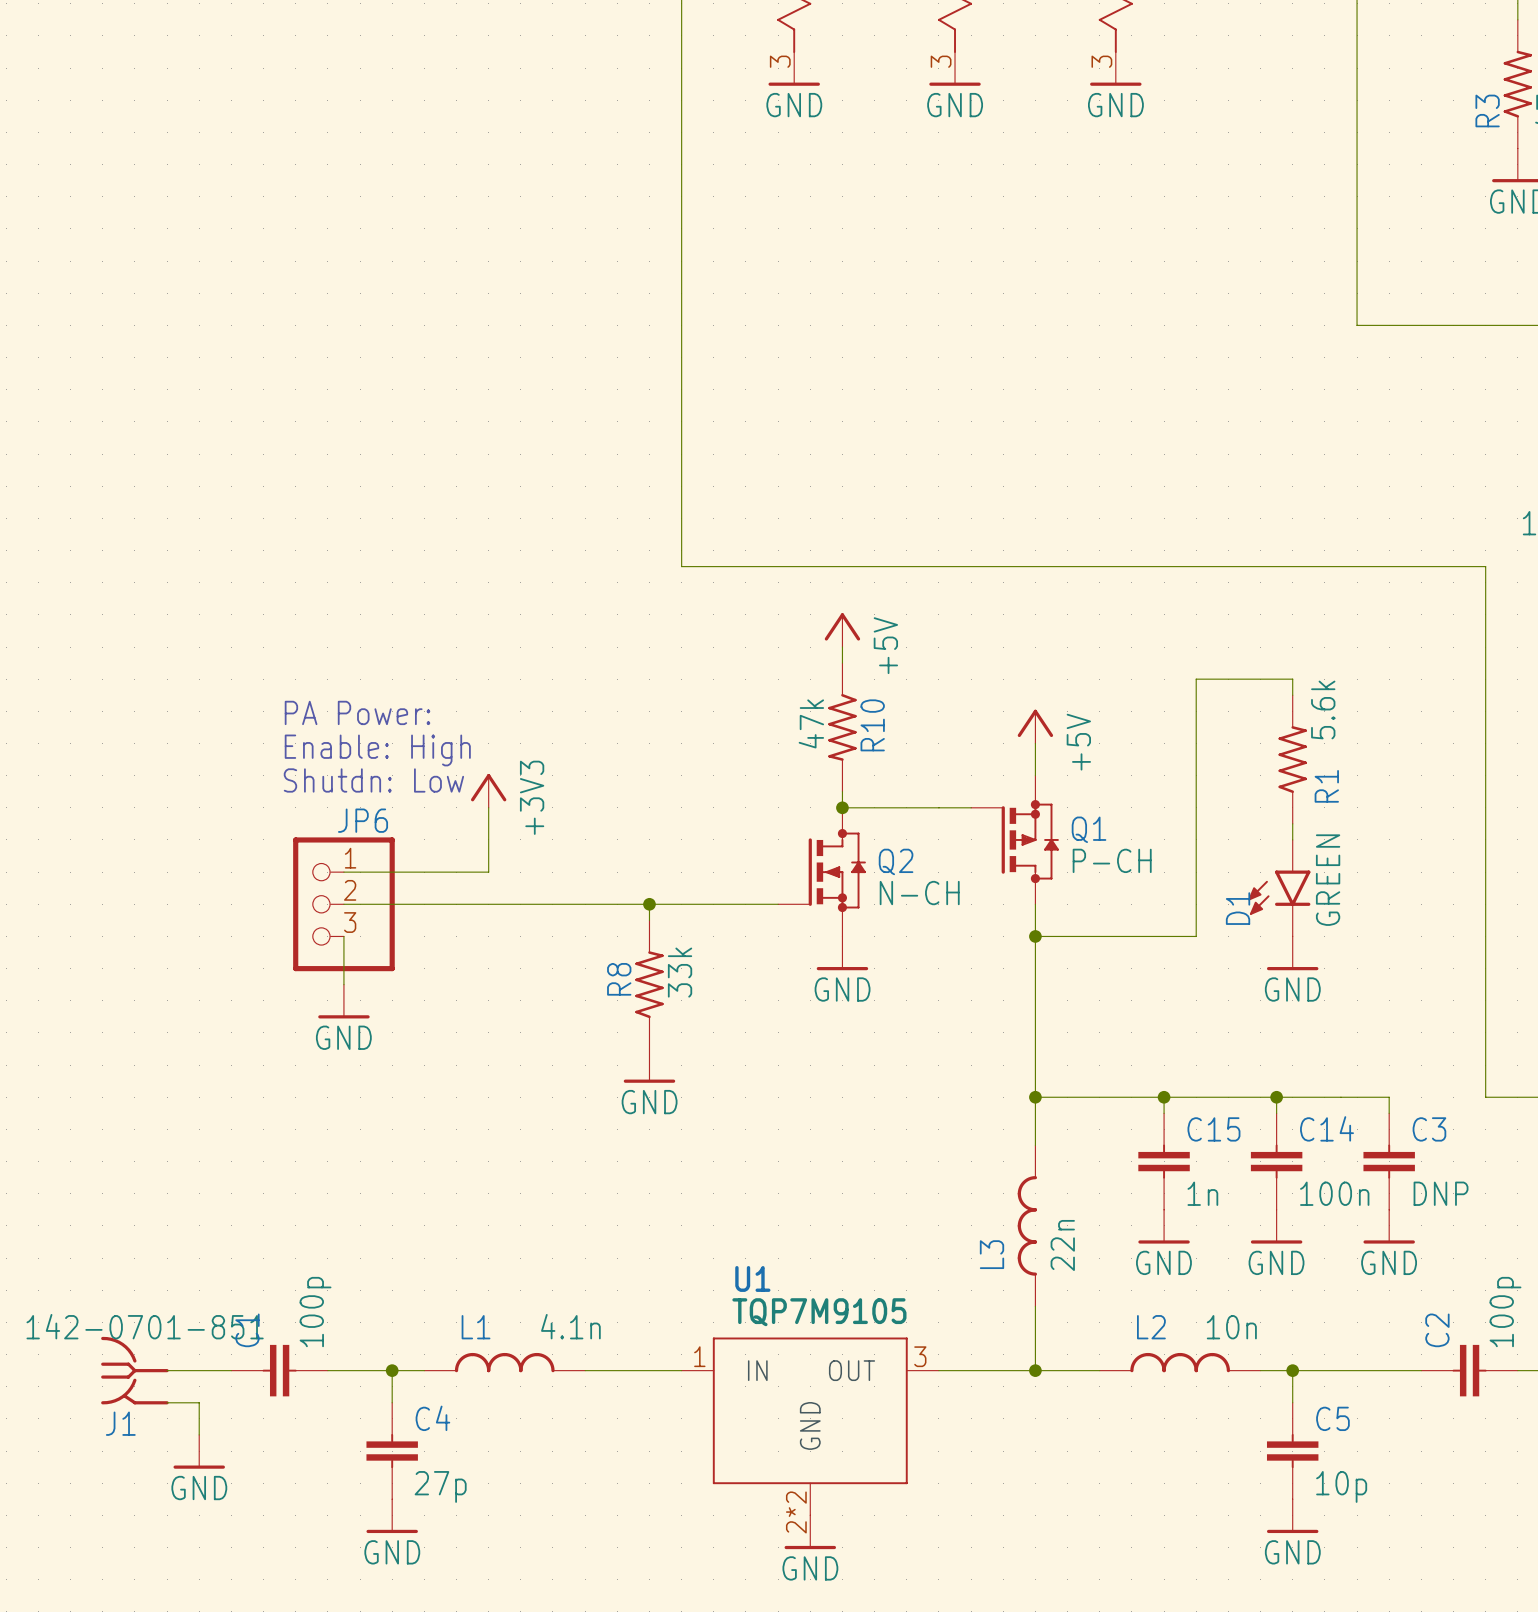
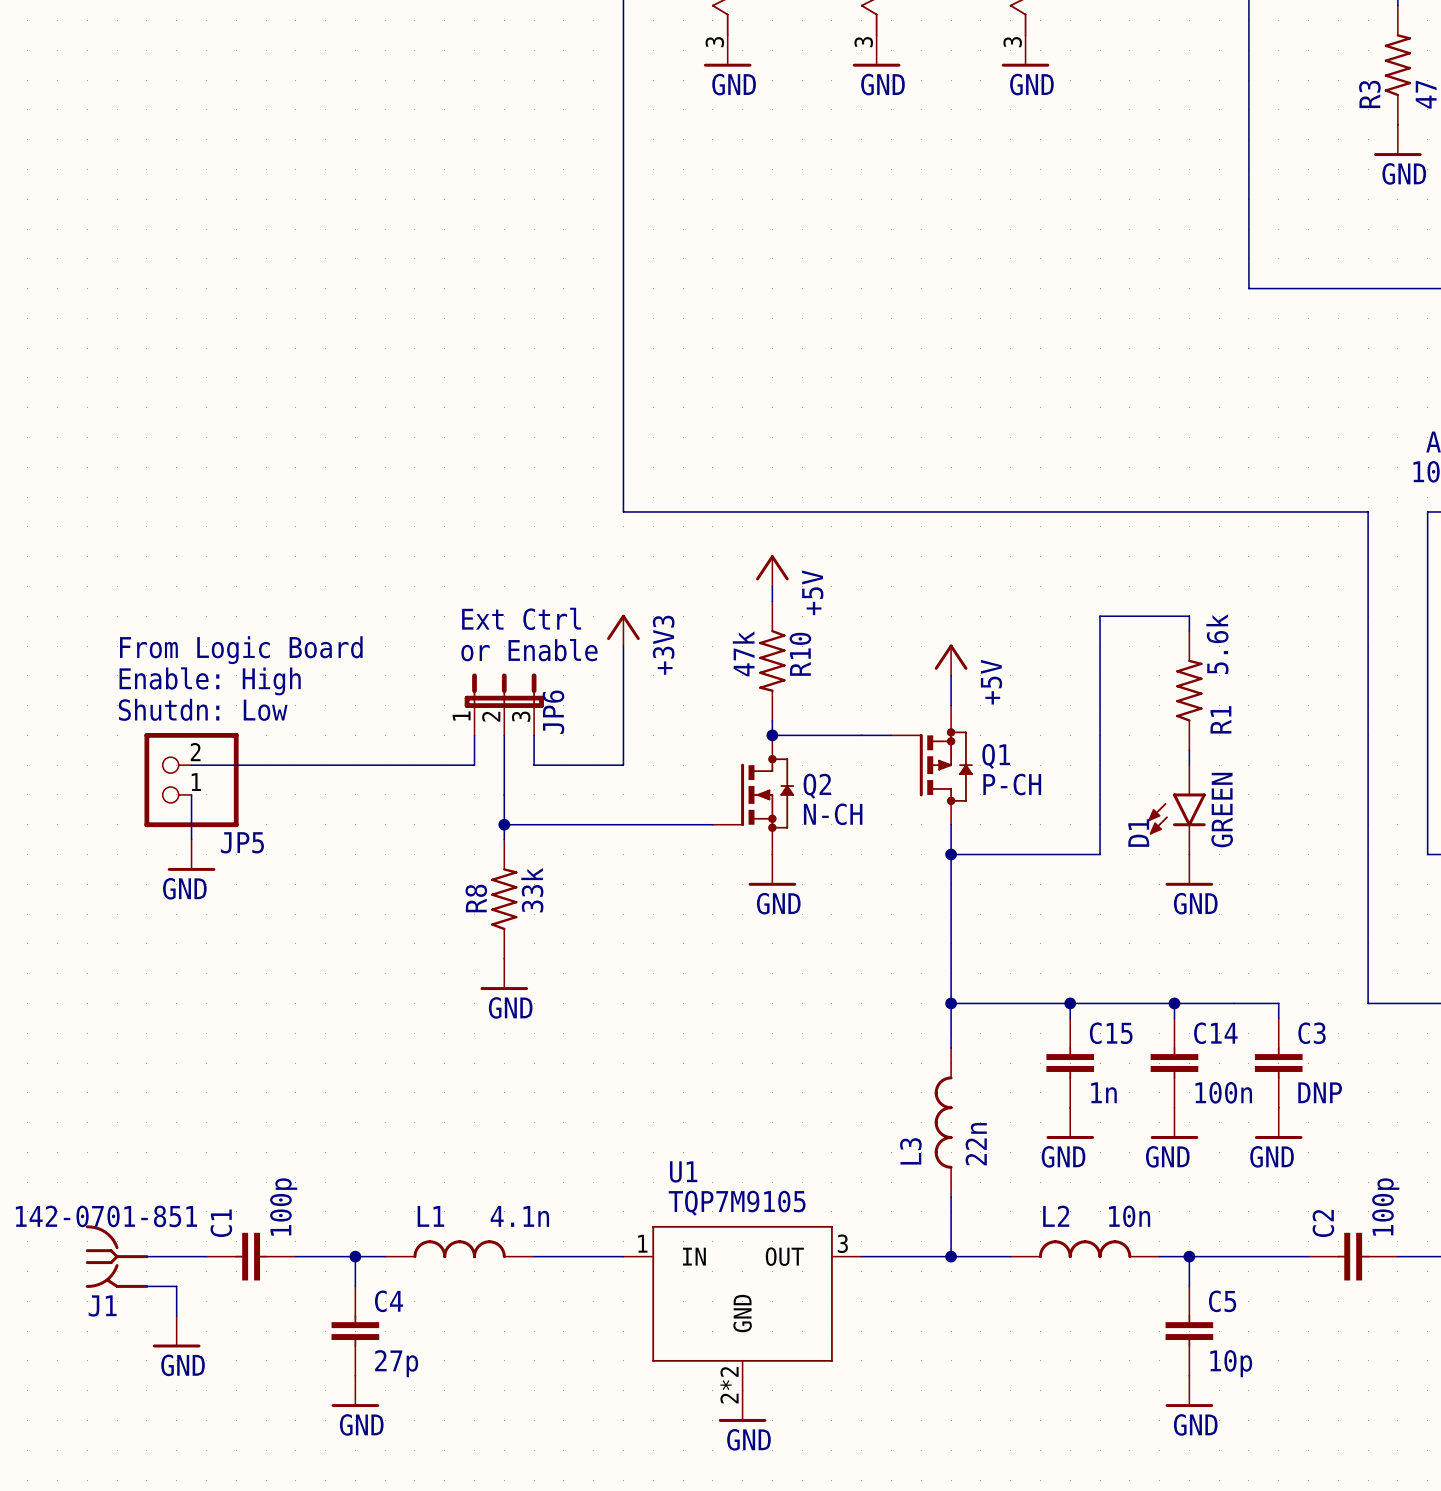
text: none -> Ext Ctrl (521, 618)
wire: none -> (623, 646) (623, 765) (534, 765) (534, 735)
text: PA Power: (357, 712) -> none
text: none -> From Logic Board (241, 650)
text: none -> or Enable (529, 650)
text position: Enable: High (377, 750) -> Enable: High (210, 681)
text position: Shutdn: Low (373, 780) -> Shutdn: Low (203, 709)
power symbol position: +3V3 (488, 790) -> +3V3 (623, 630)
wire: (488, 807) (488, 872) (343, 872) -> none
wire: none -> (474, 735) (474, 765) (191, 765)
wire: none -> (504, 735) (504, 839)
JP6 name position: JP6 (363, 820) -> JP6 (553, 712)
JP6 symbol: [293, 837, 395, 972] -> [464, 673, 544, 736]
JP5: none -> (191, 780)
wire: (343, 904) (552, 904) -> none
junction: none -> (504, 824)
wire: (649, 904) (649, 920) -> none
junction: (649, 904) -> none
wire: (343, 936) (343, 984) -> (191, 794) (191, 839)
power symbol: none -> GND (191, 855)
R8 position: (649, 984) -> (504, 899)
power symbol: GND (343, 1001) -> none
power symbol position: GND (649, 1065) -> GND (504, 974)

